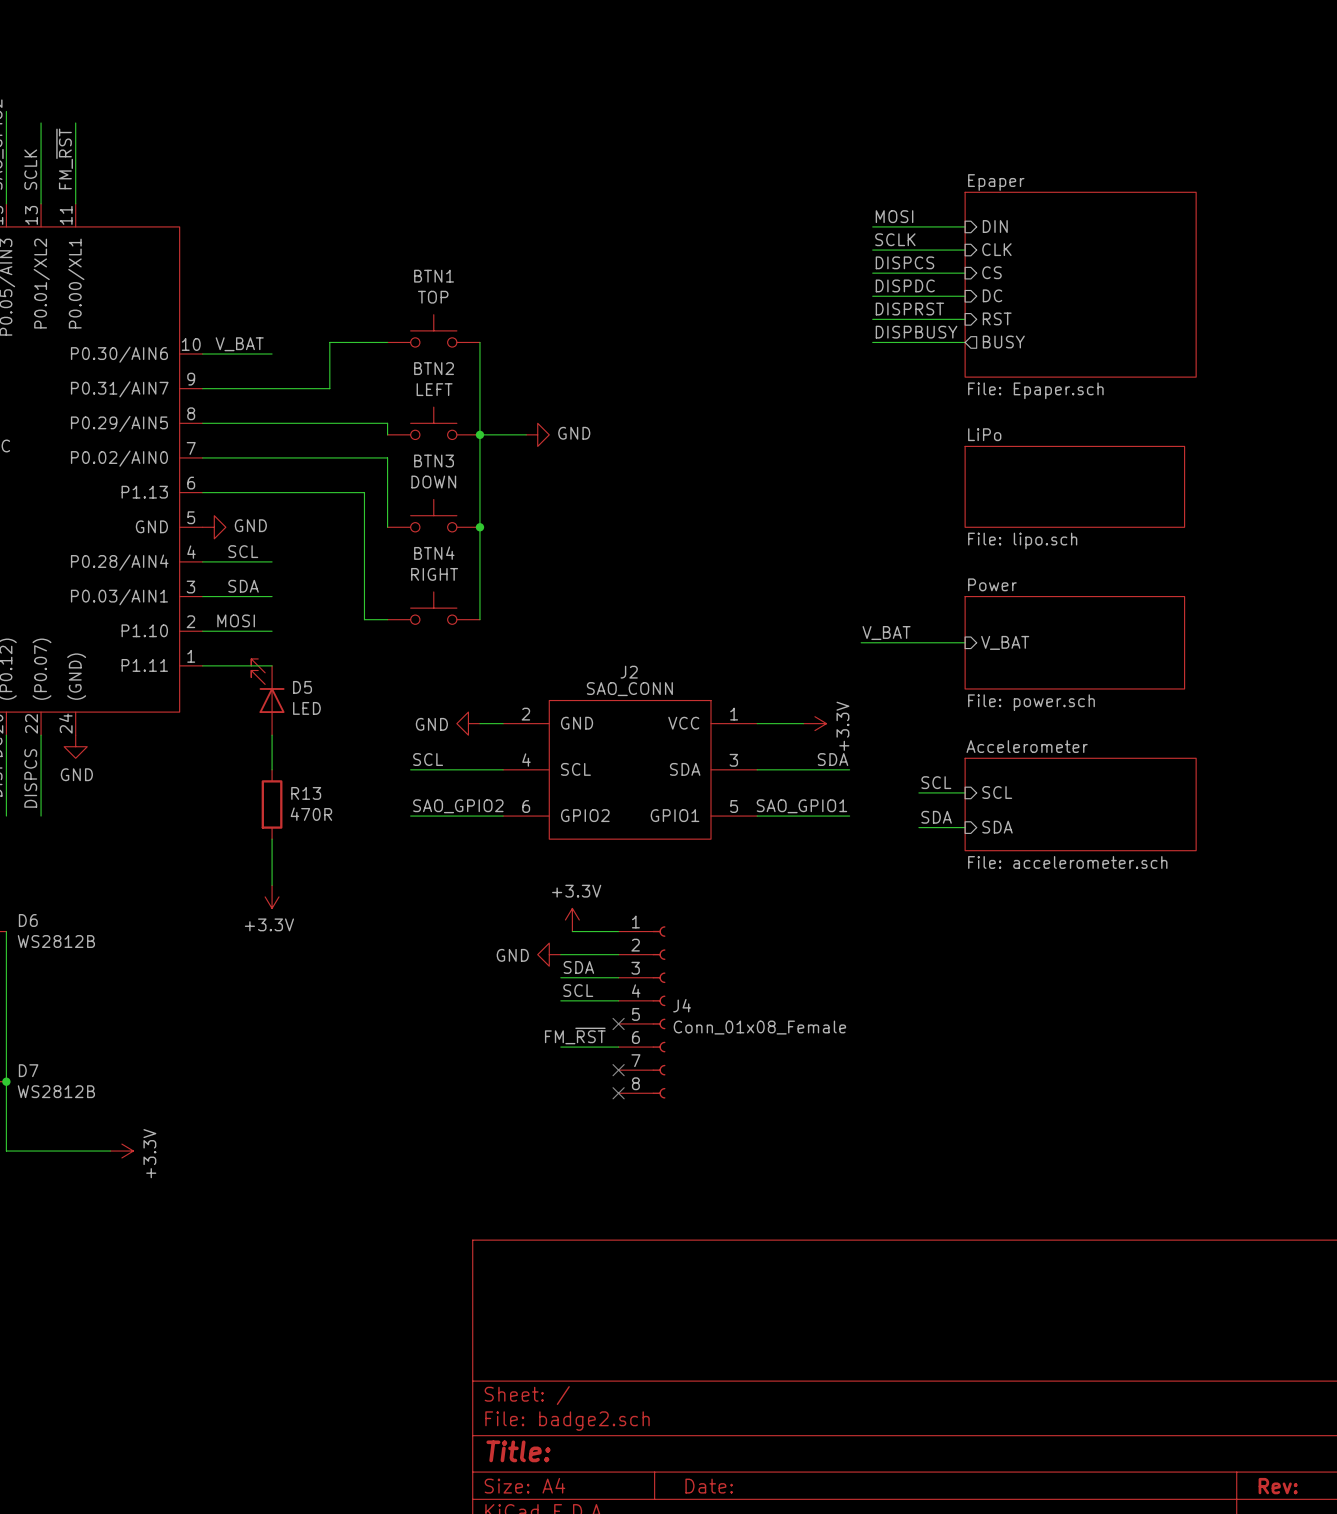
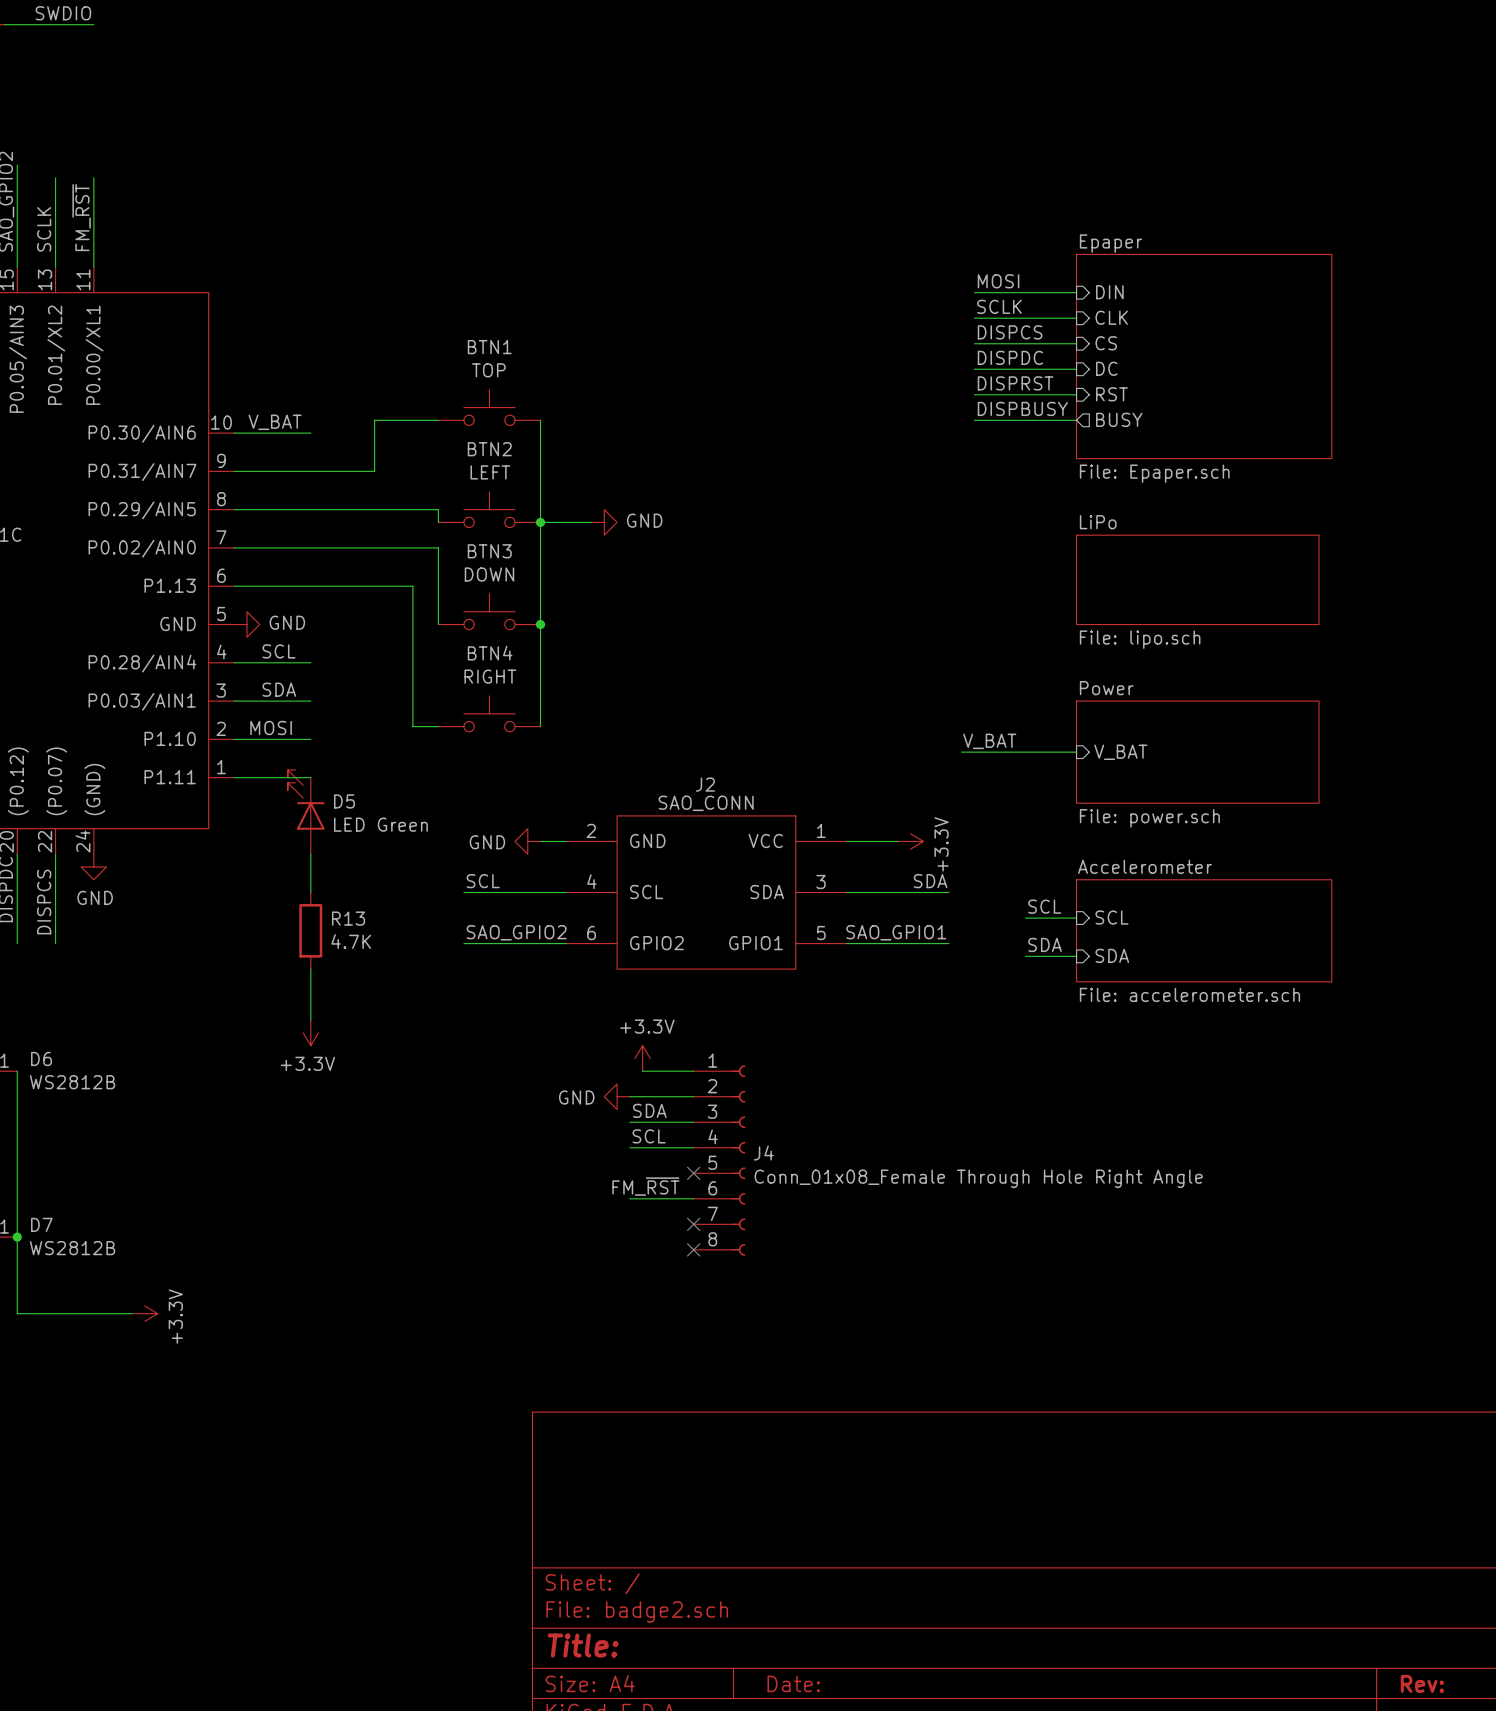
D5 value: LED (306, 708) -> LED Green (380, 824)
R13 value: 470R (311, 814) -> 4.7K (351, 941)
J4 value: Conn_01x08_Female (759, 1027) -> Conn_01x08_Female Through Hole Right Angle (978, 1178)

